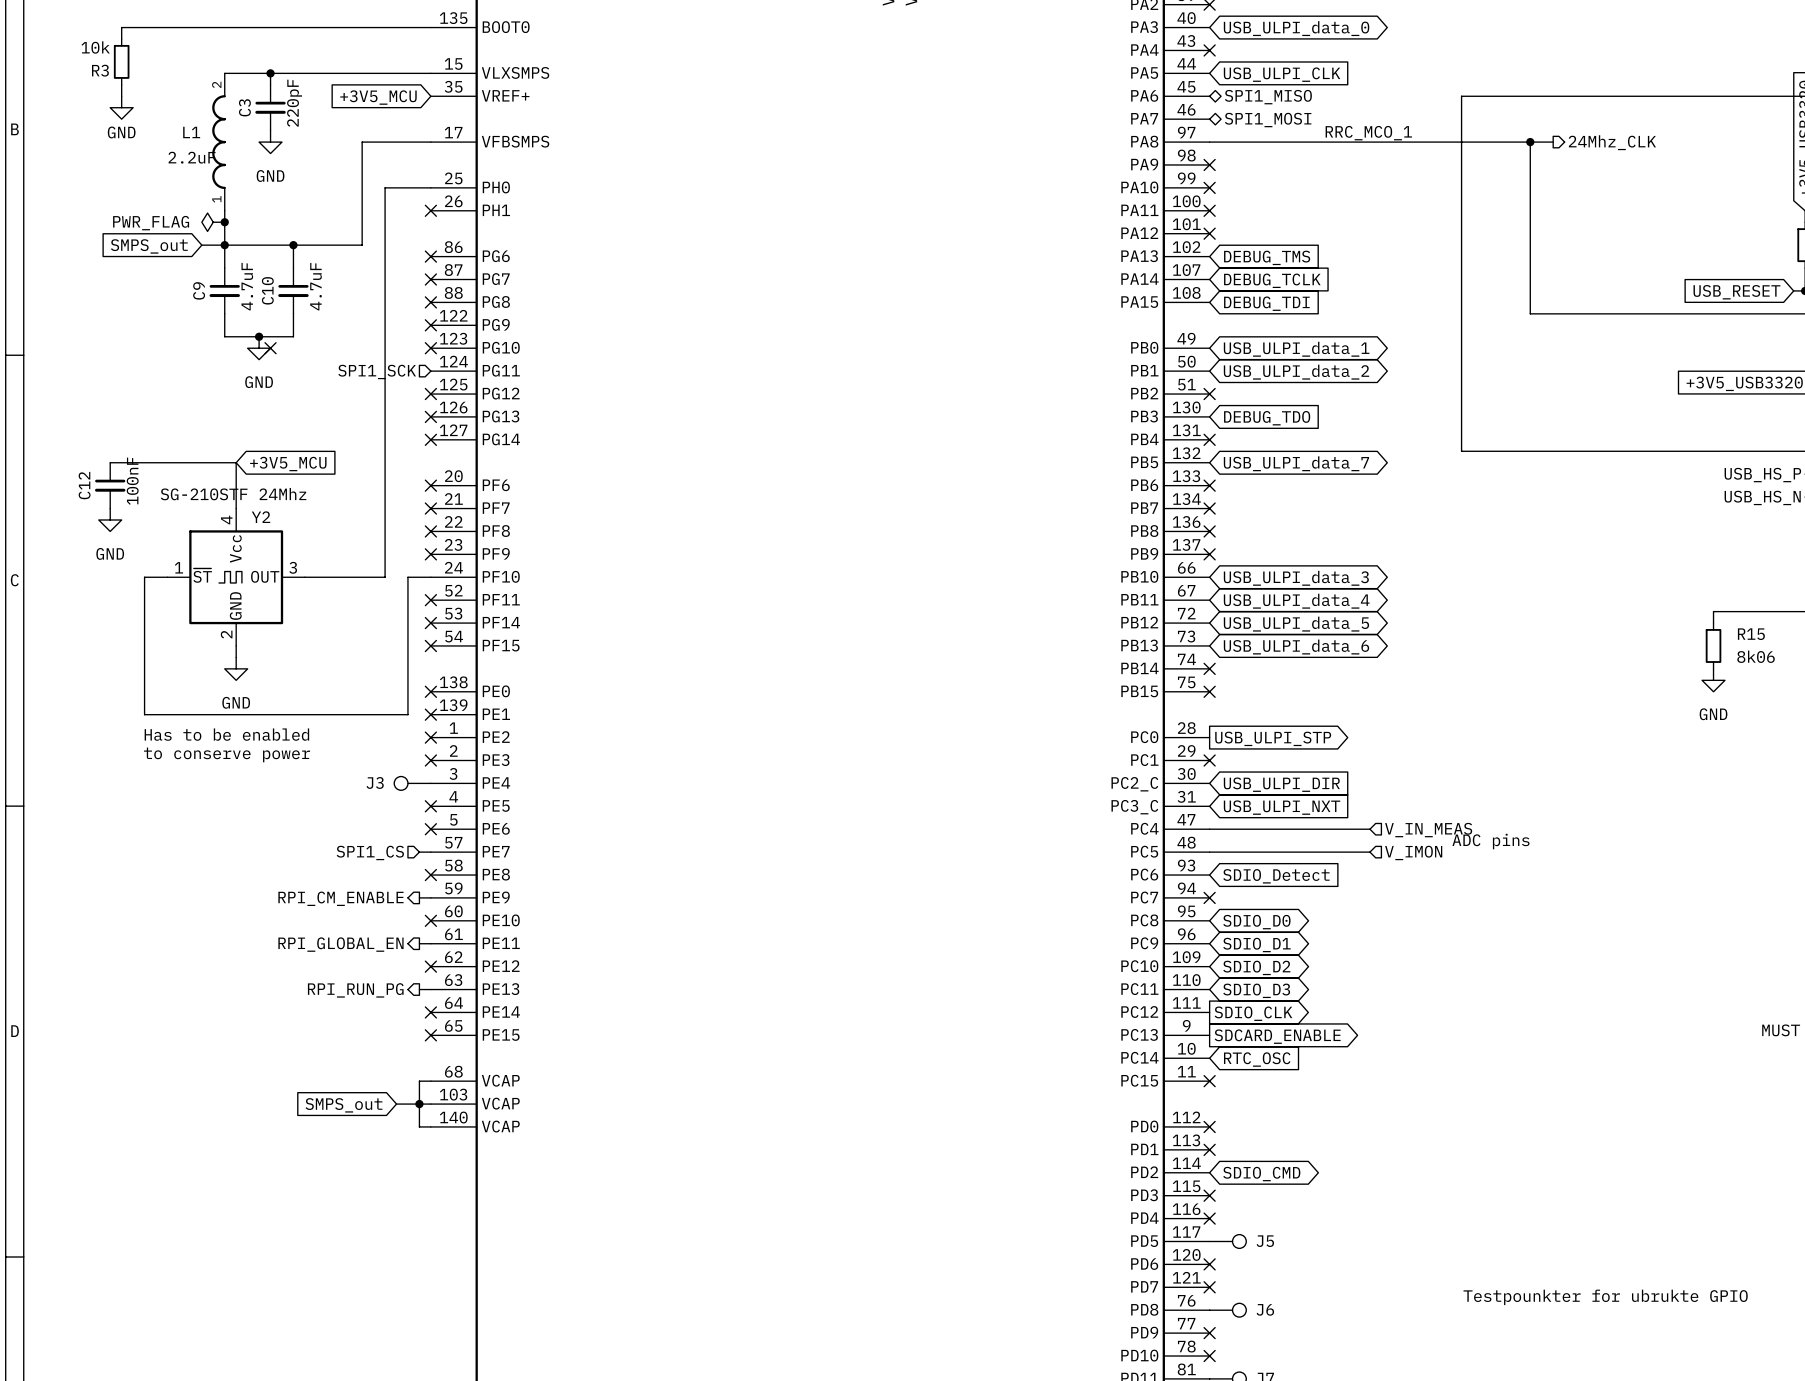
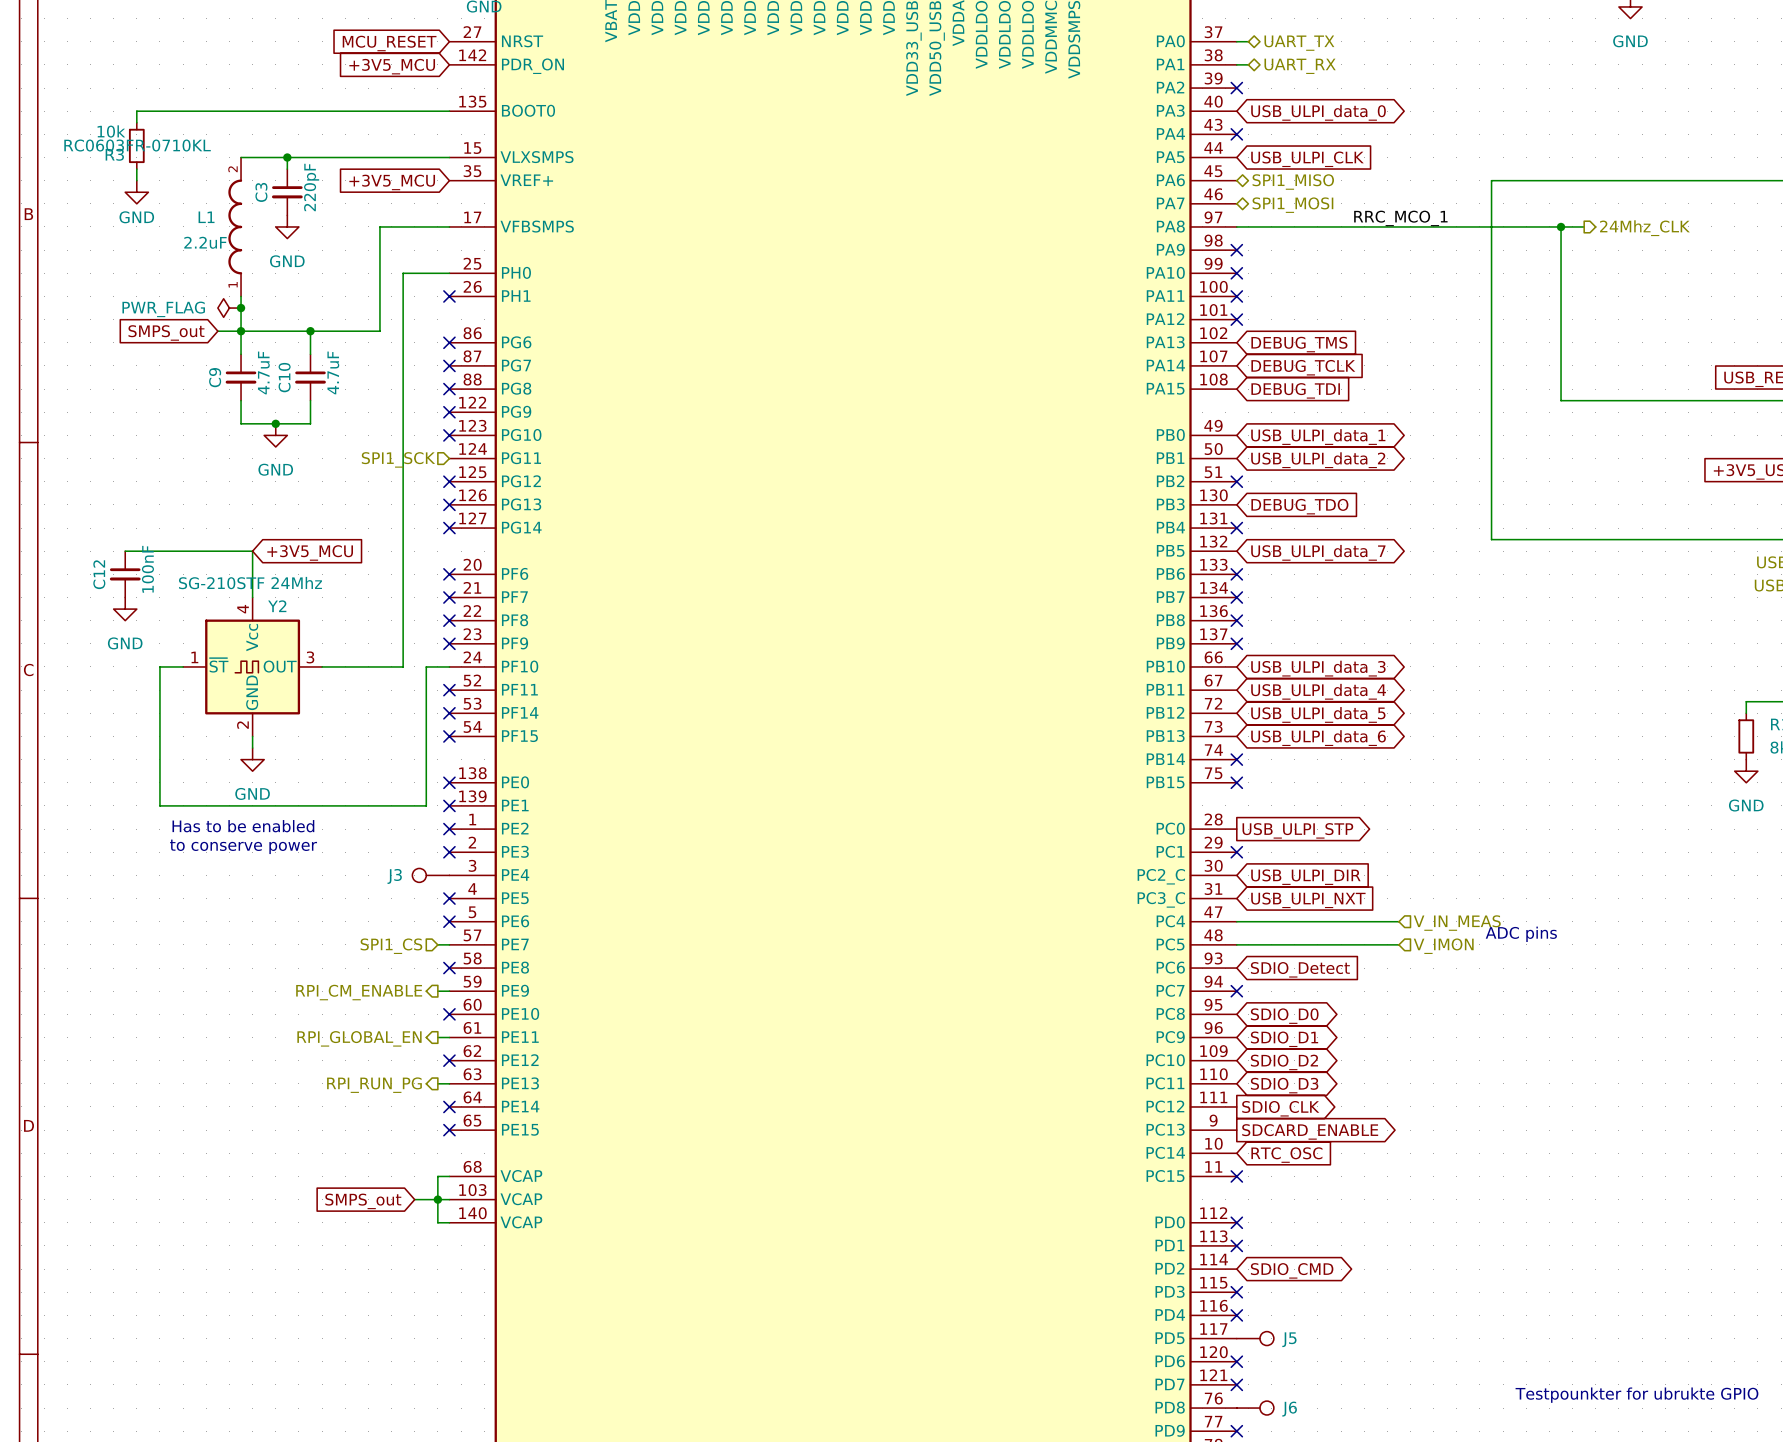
R3 text: none -> RC0603FR-0710KL (137, 145)
no-connect mark: (270, 348) -> none

